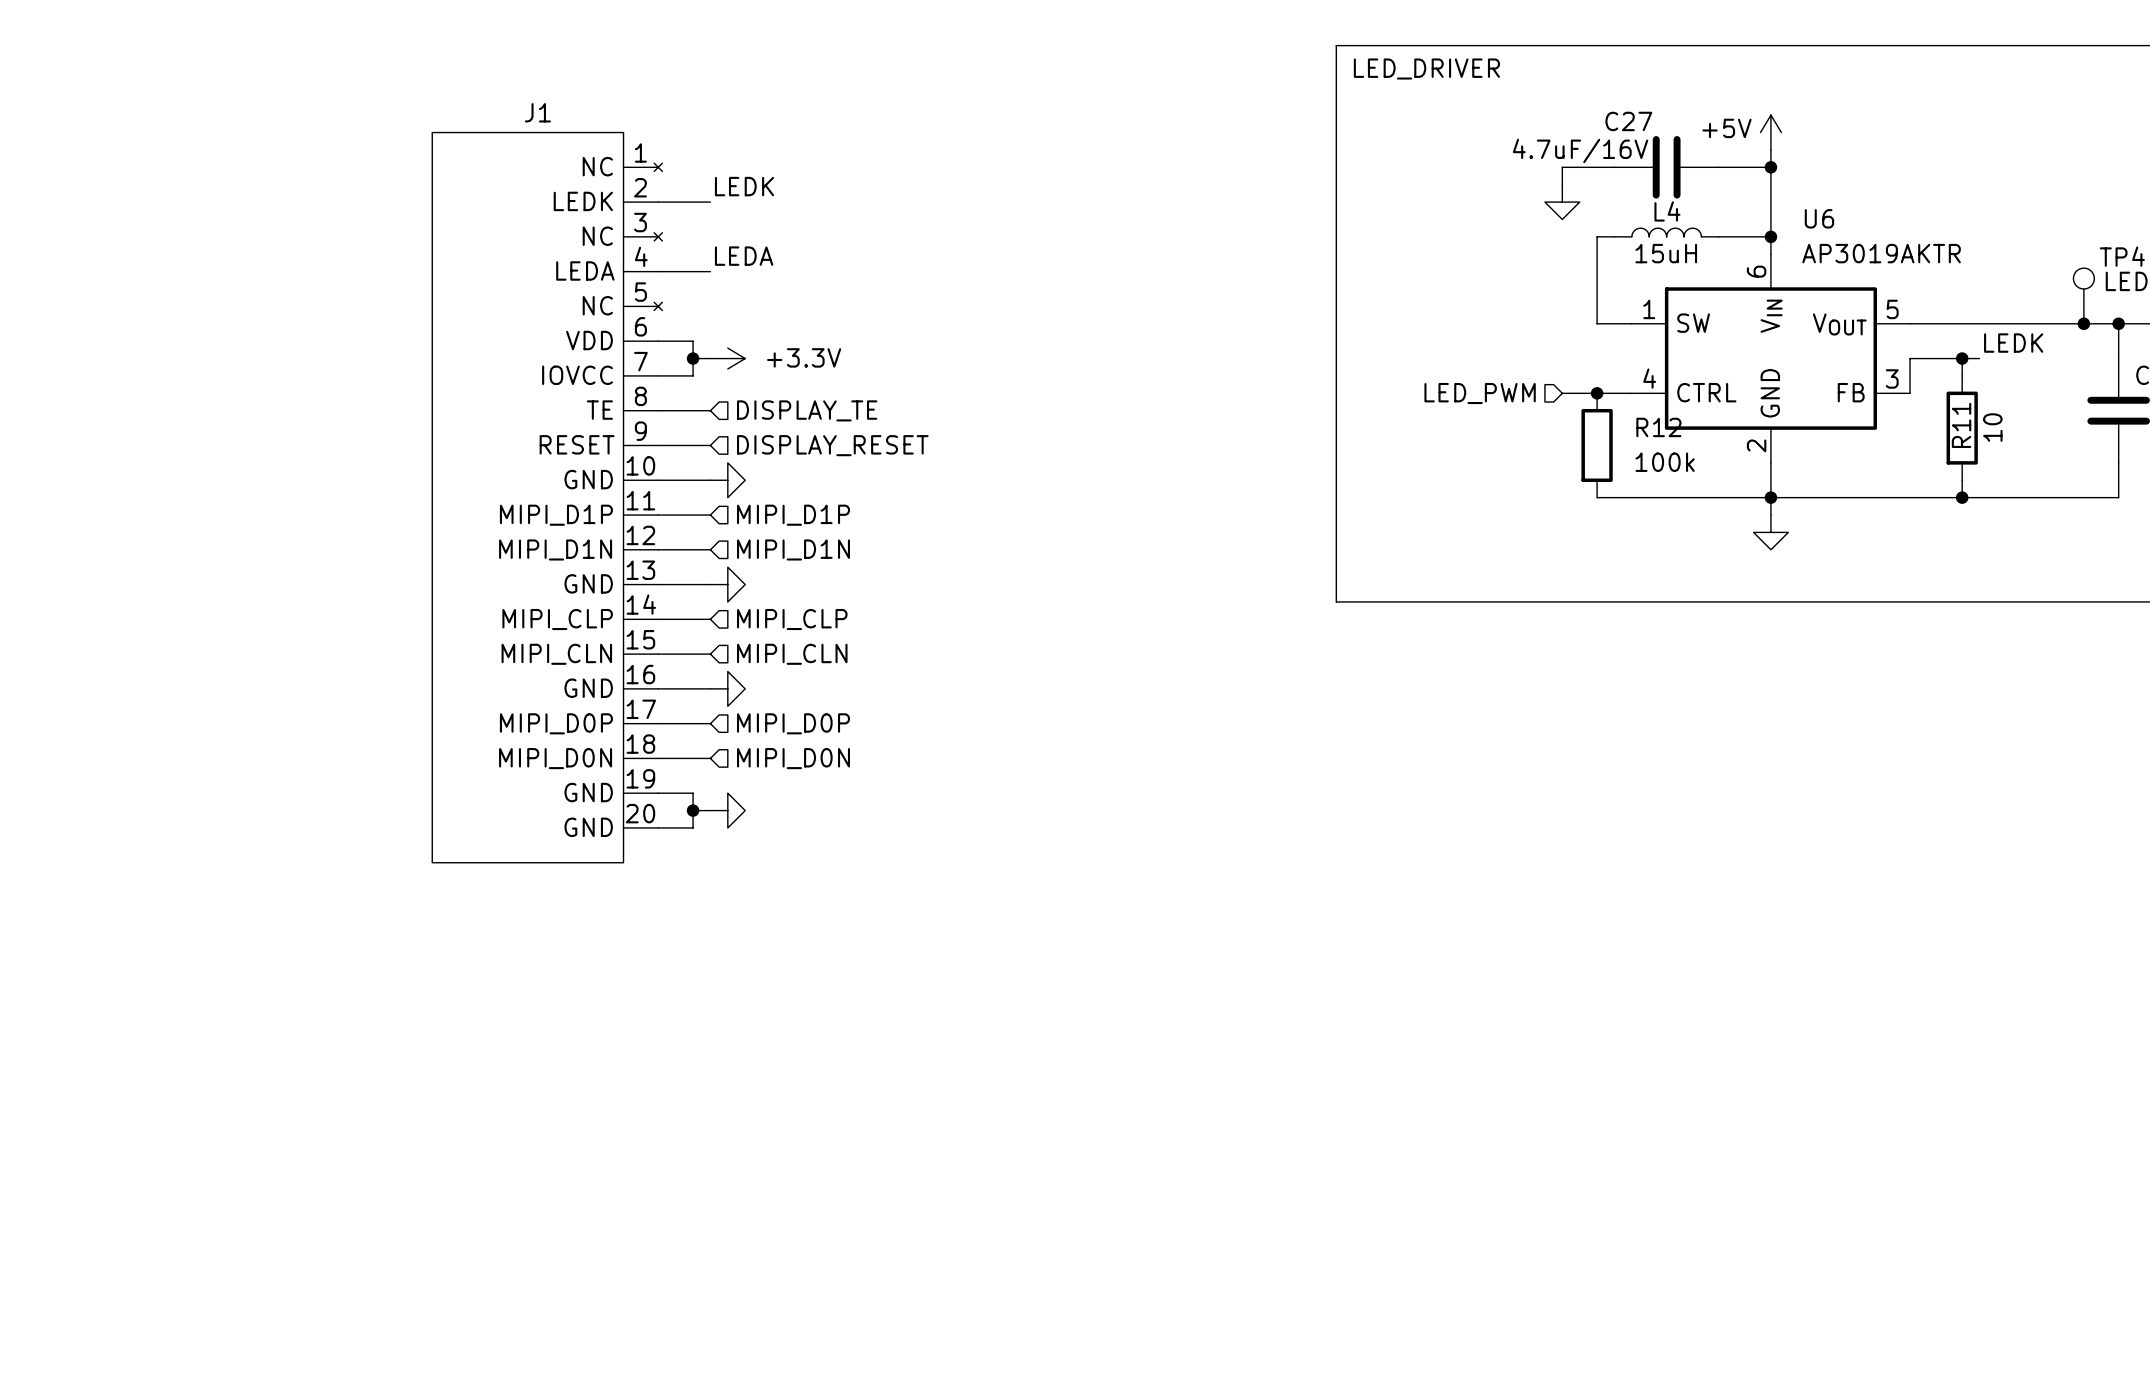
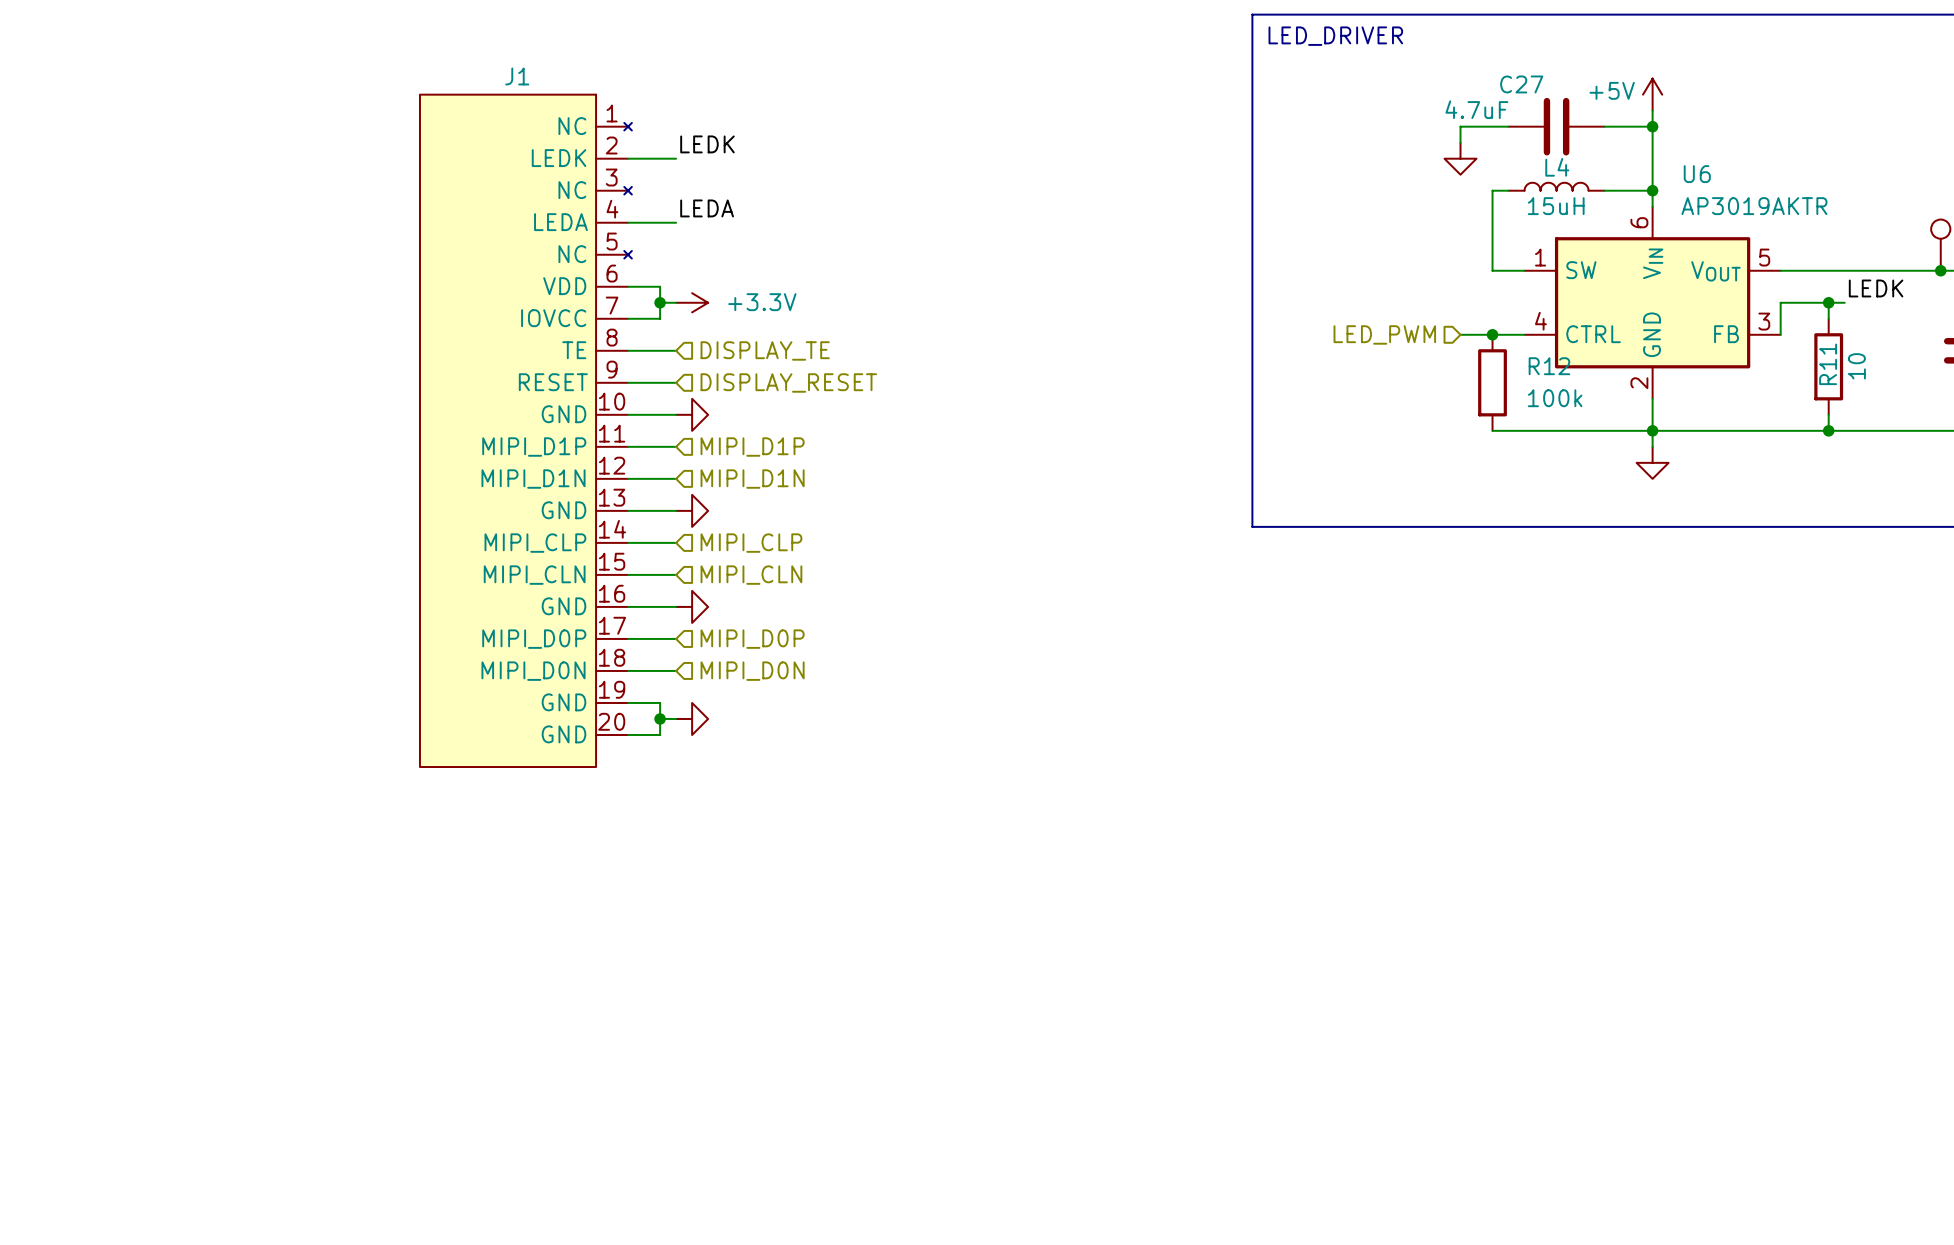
C27 value: 4.7uF/16V (1580, 150) -> 4.7uF (1476, 109)

